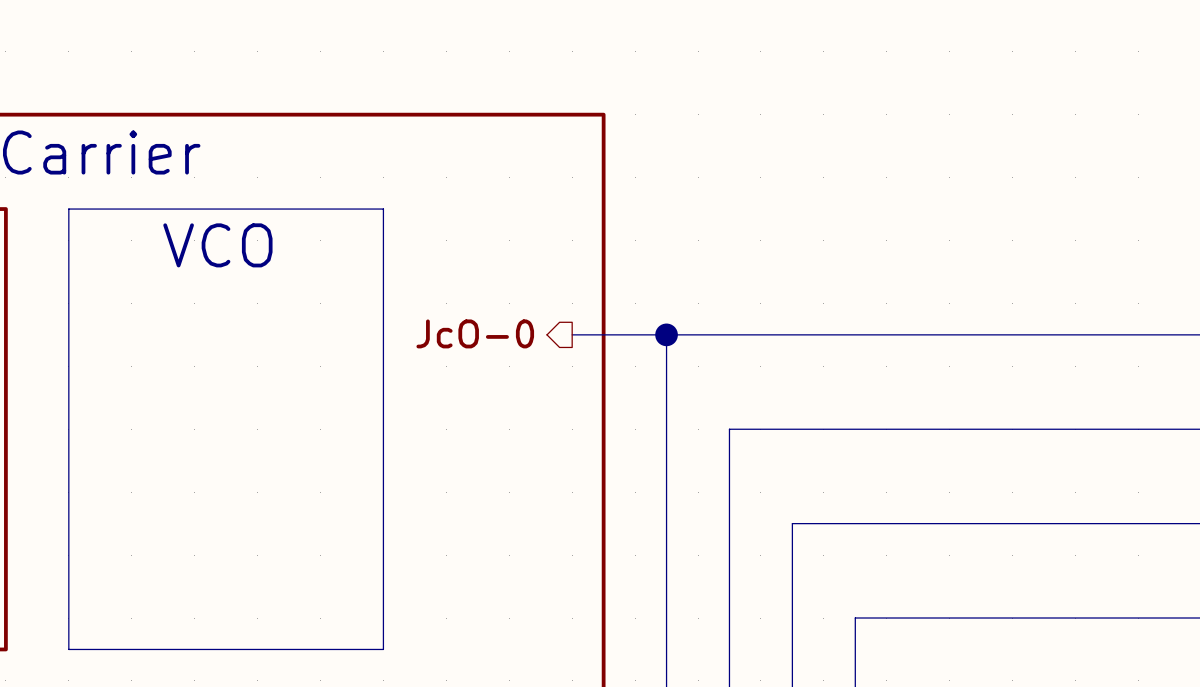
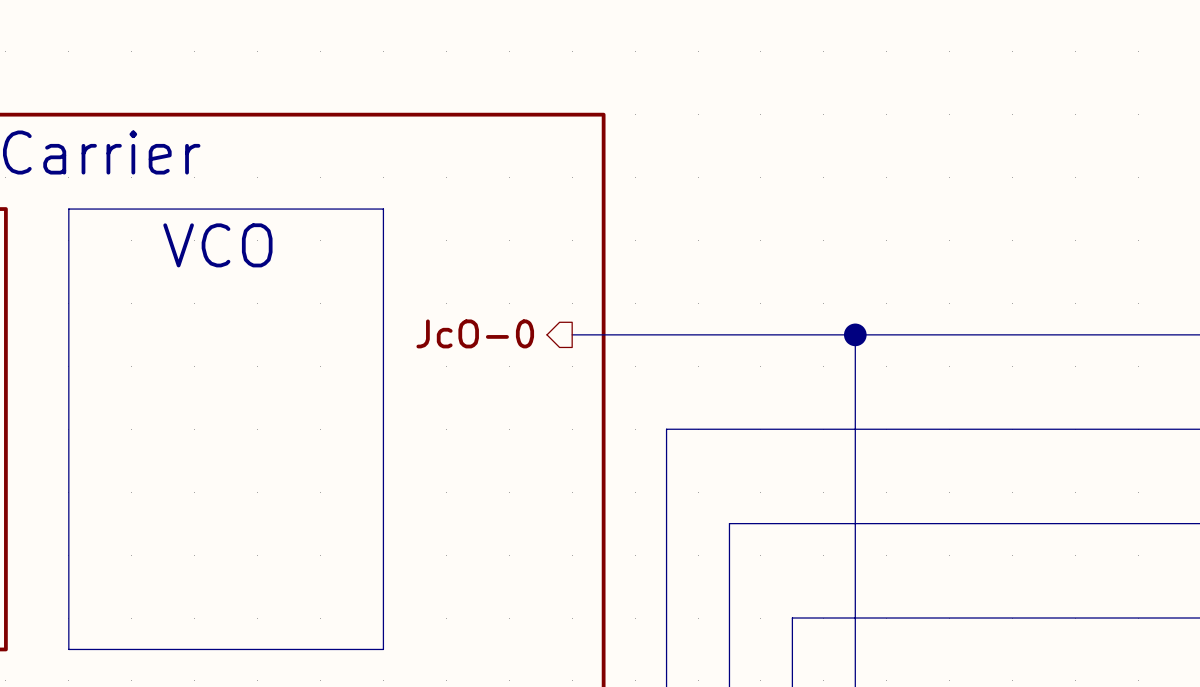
bus: (666, 334) (666, 429) -> (729, 429) (666, 429)
junction: (666, 334) -> none
junction: none -> (855, 334)
bus: (729, 429) (729, 523) -> (792, 523) (729, 523)
bus: (792, 523) (792, 618) -> (855, 334) (855, 618) (792, 618)

